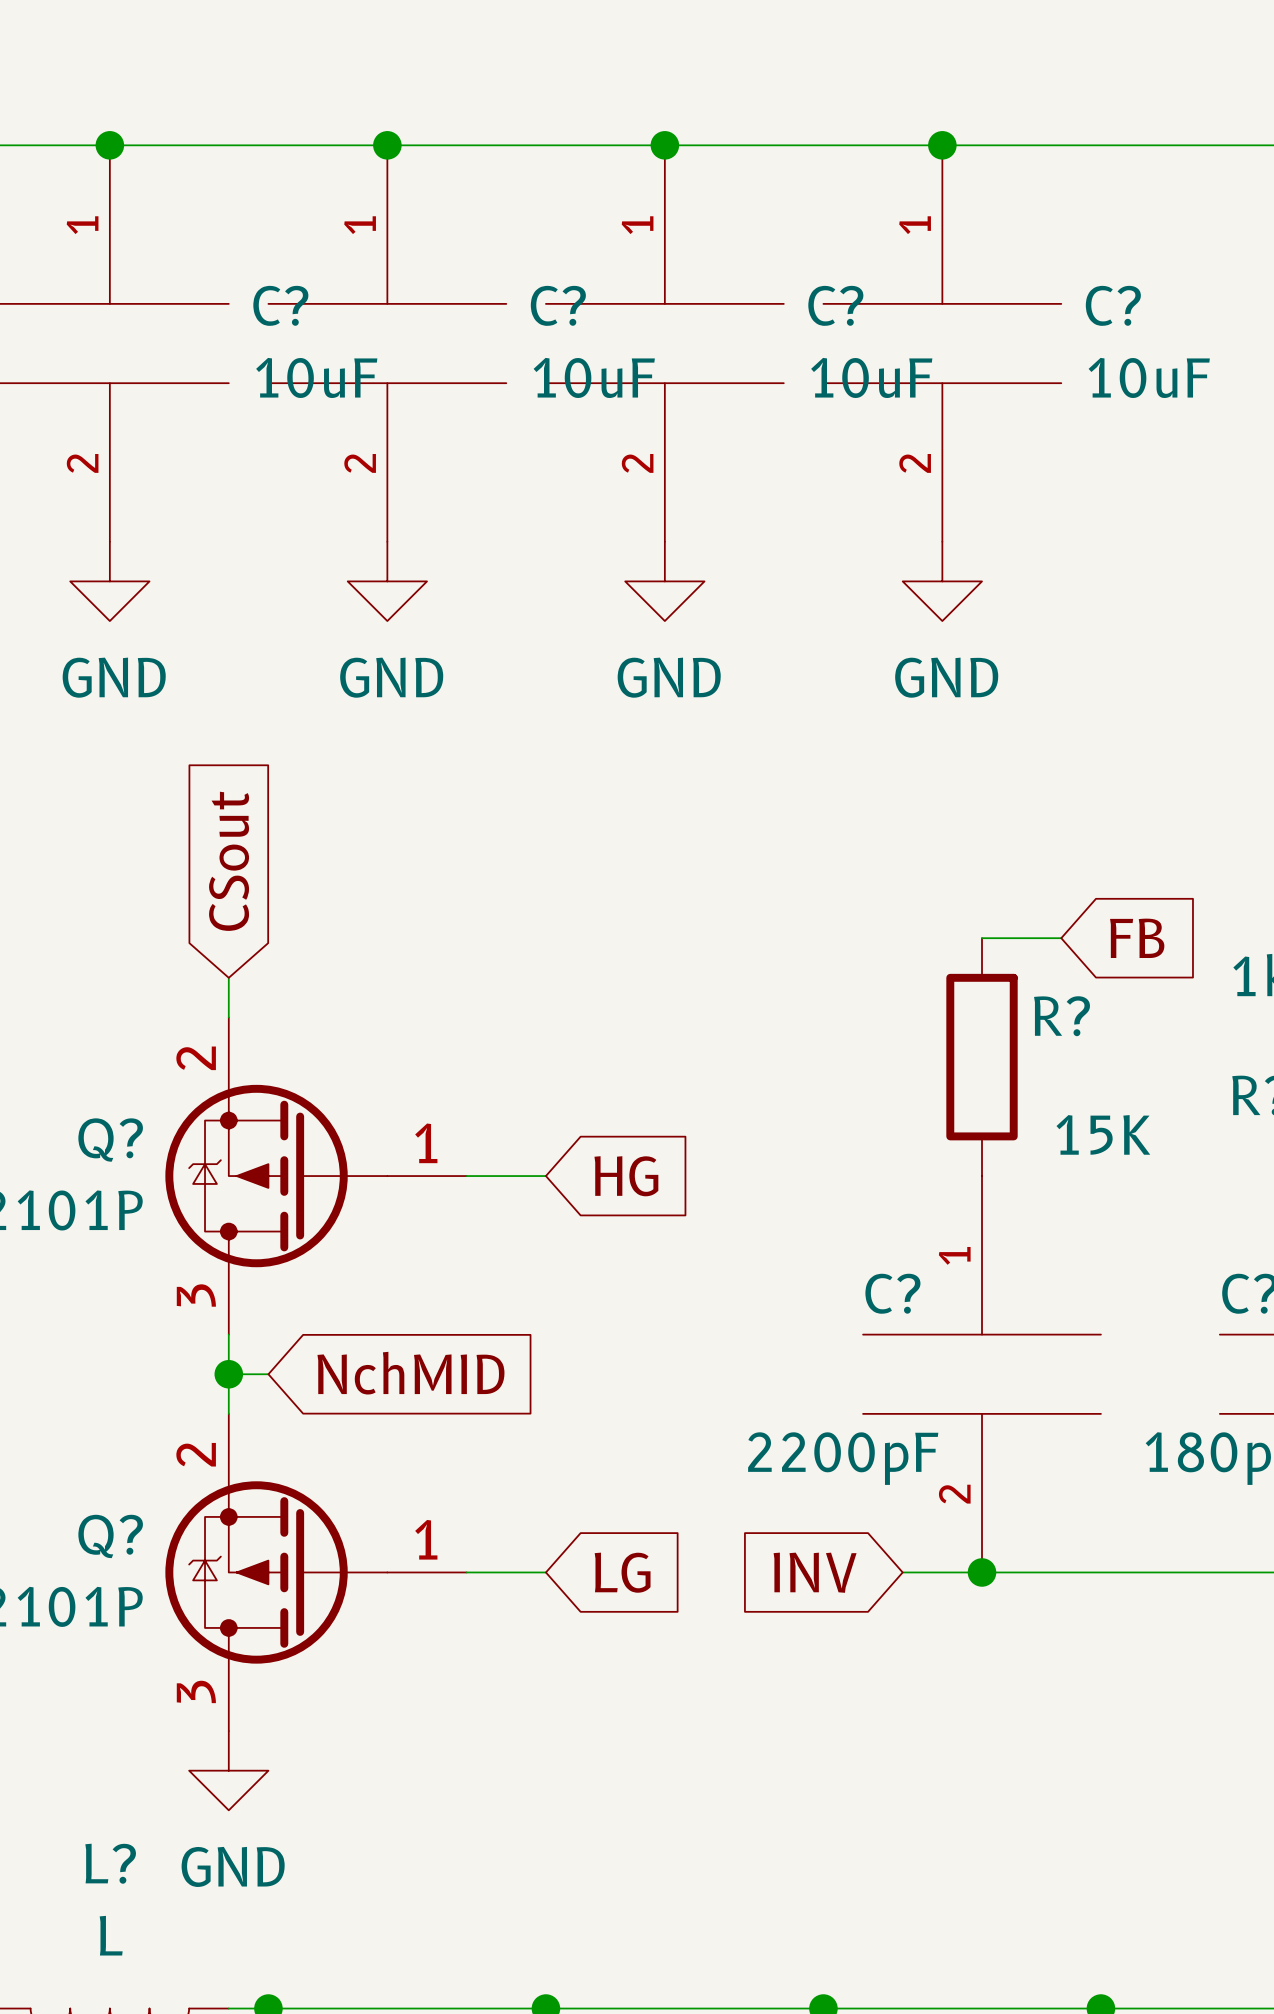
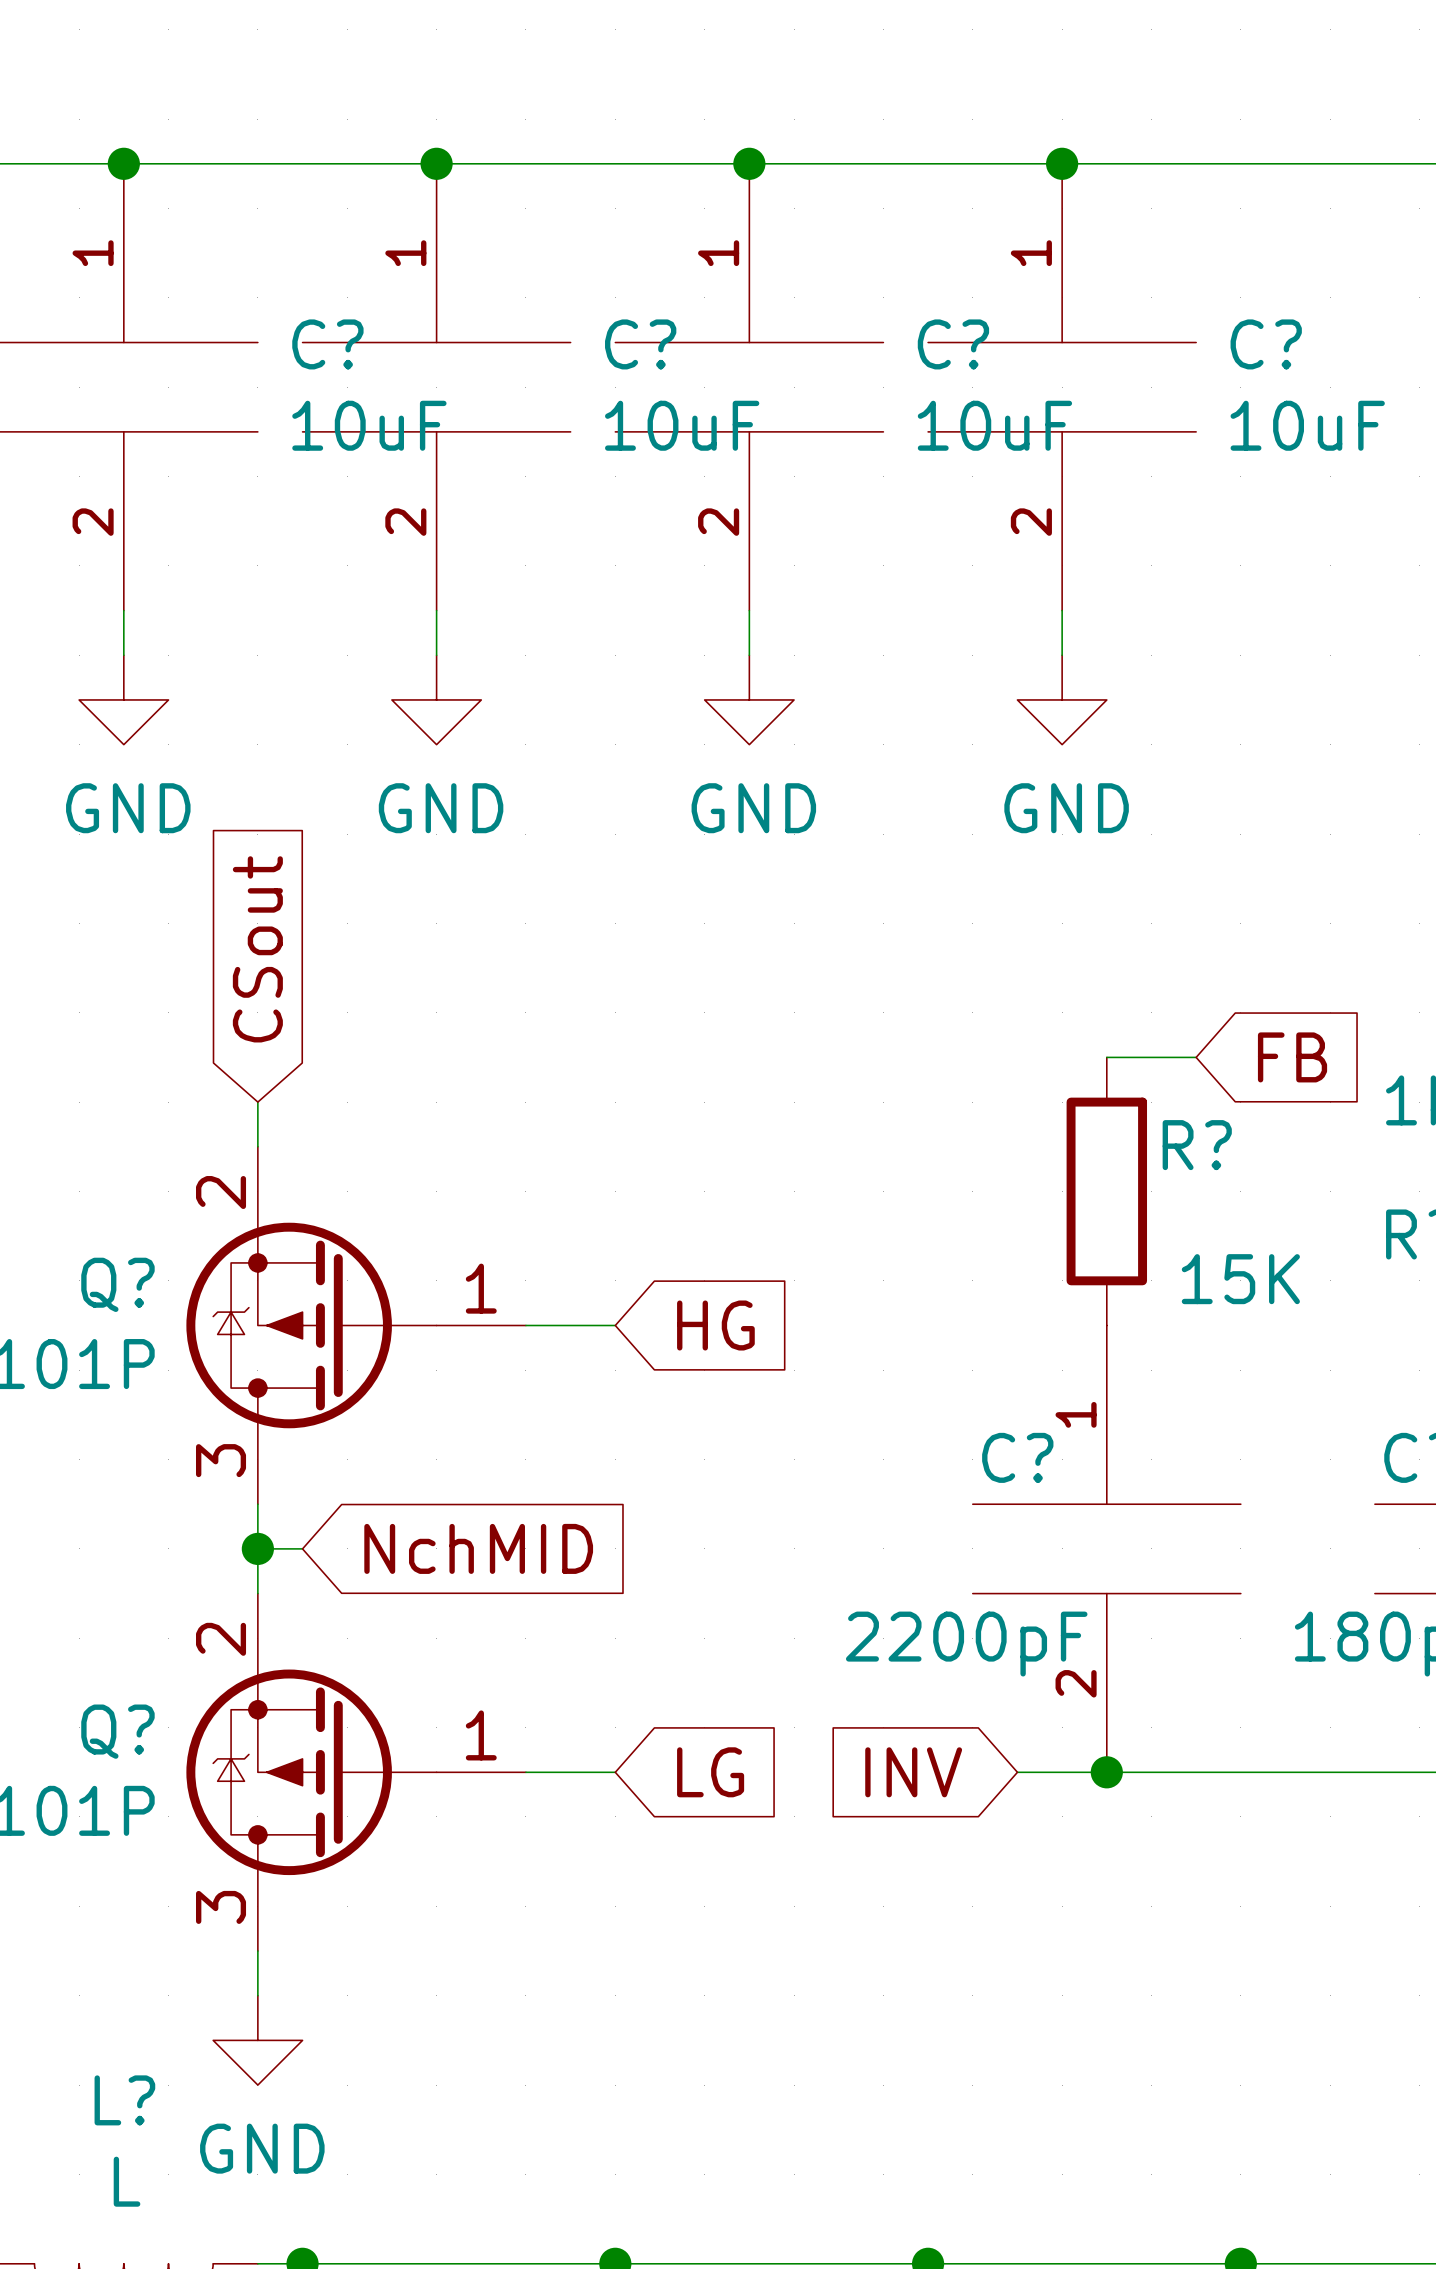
power symbol position: GND (109, 581) -> GND (123, 699)
power symbol position: GND (387, 581) -> GND (436, 699)
power symbol position: GND (664, 581) -> GND (749, 699)
power symbol position: GND (942, 581) -> GND (1062, 699)
power symbol position: GND (228, 1770) -> GND (257, 2040)

